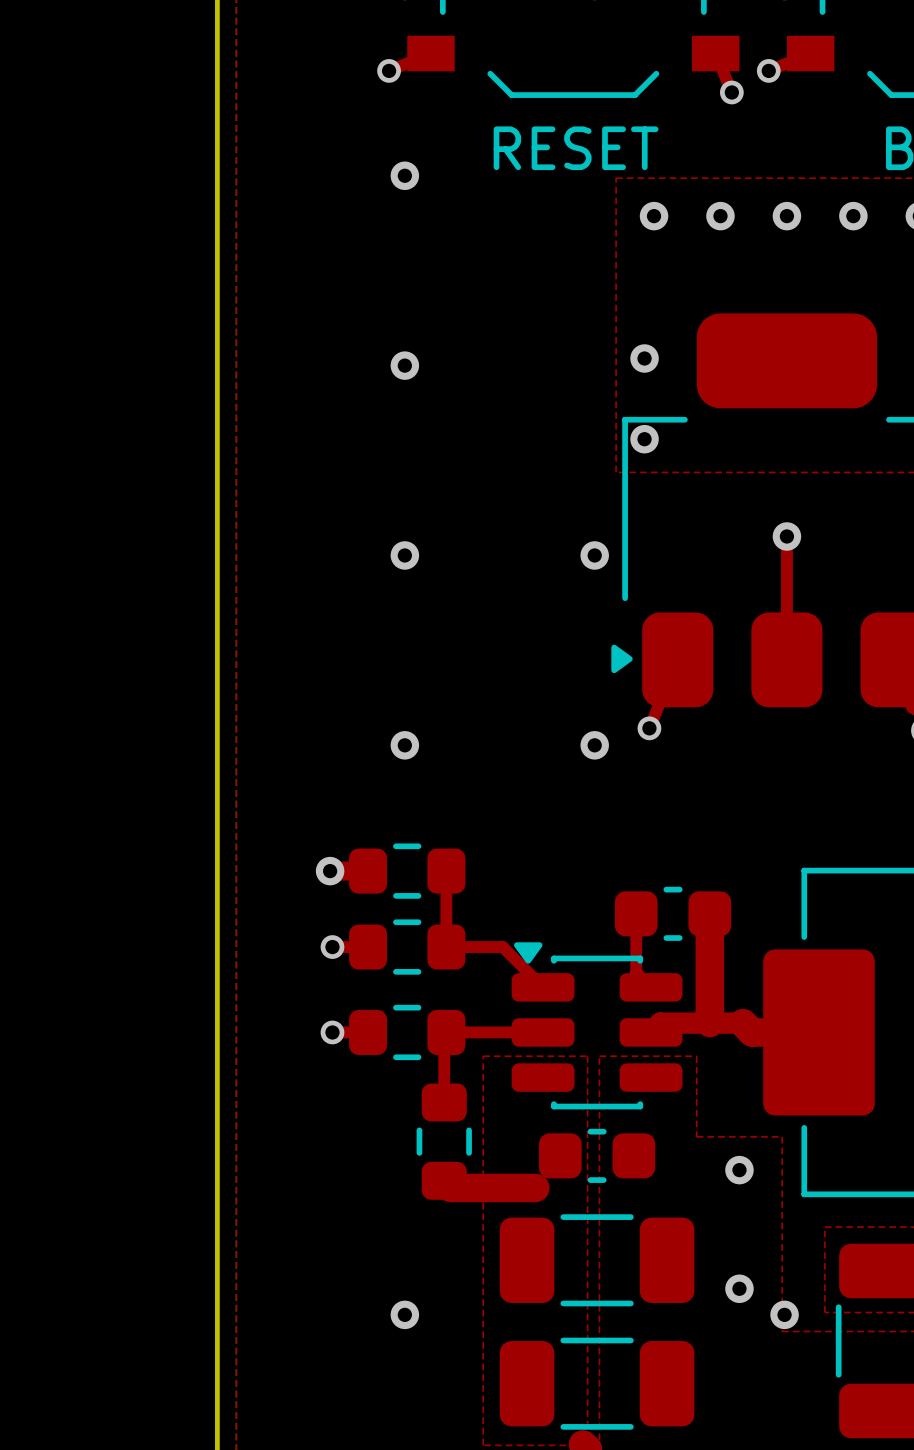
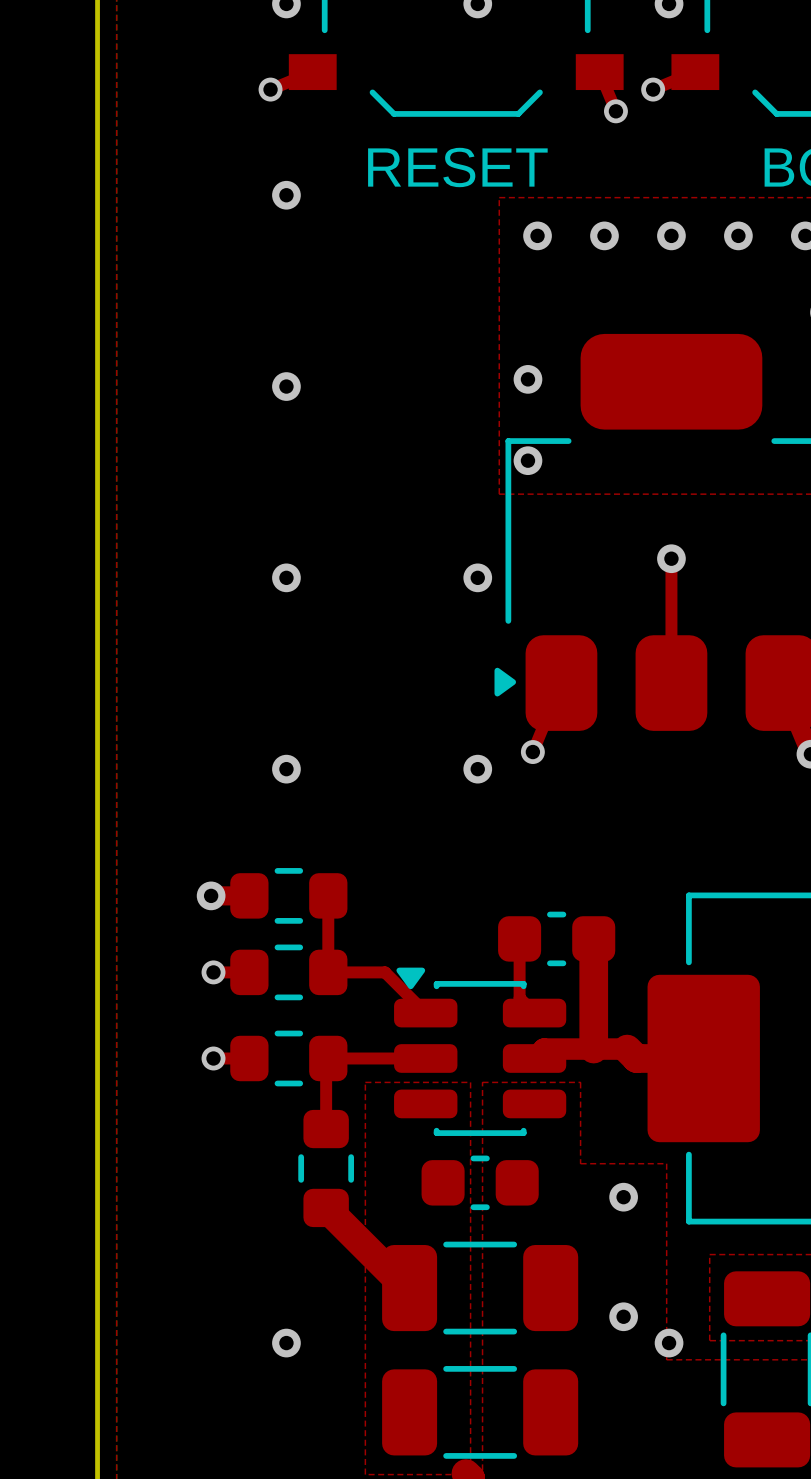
top track: (451, 1187) (535, 1187) -> (333, 1215) (406, 1288) (409, 1288)

